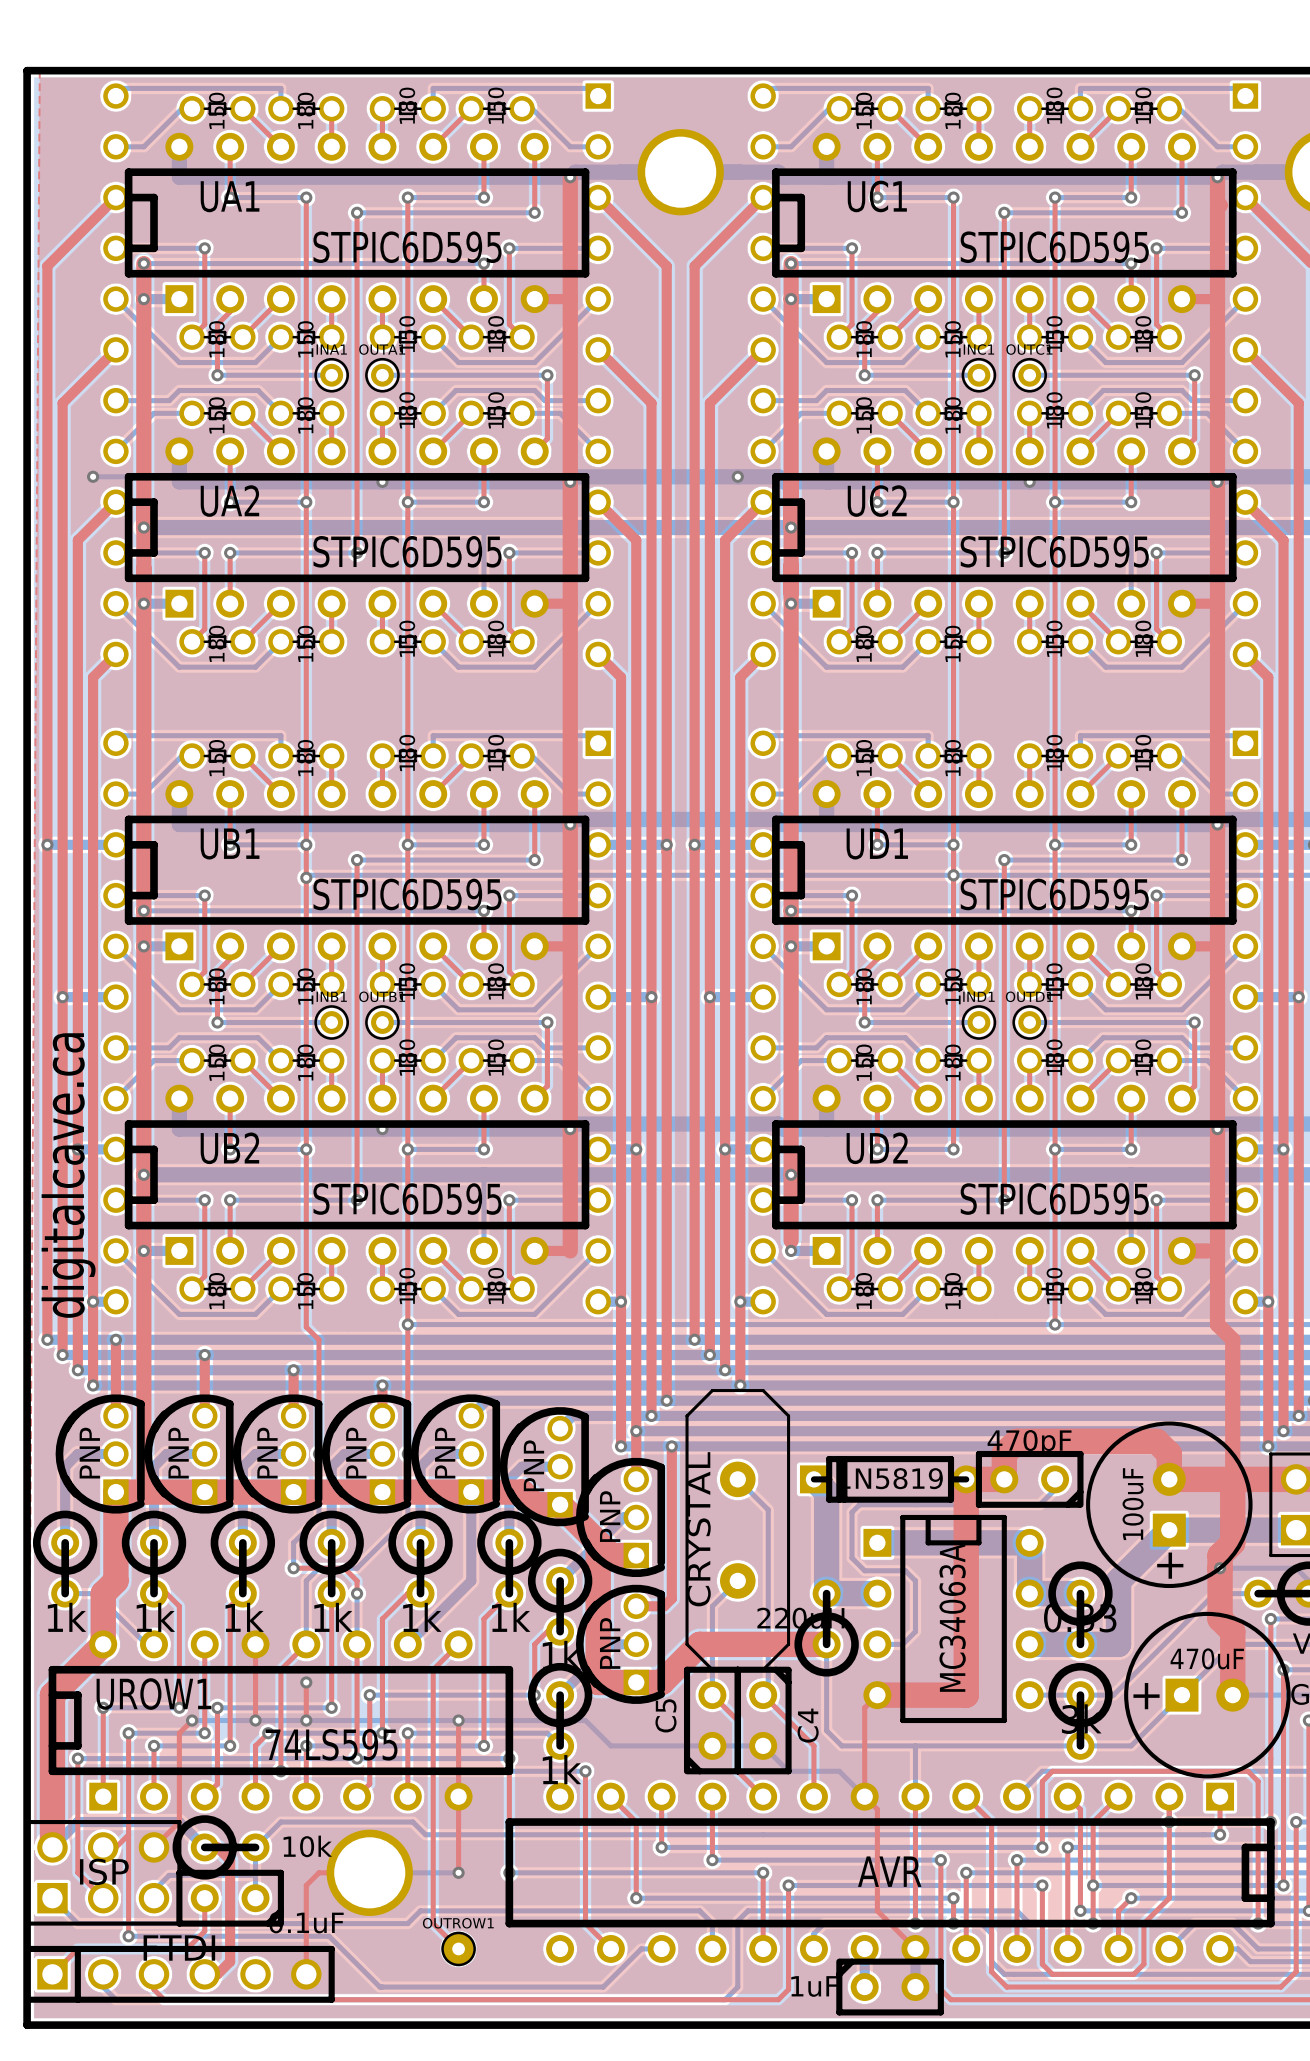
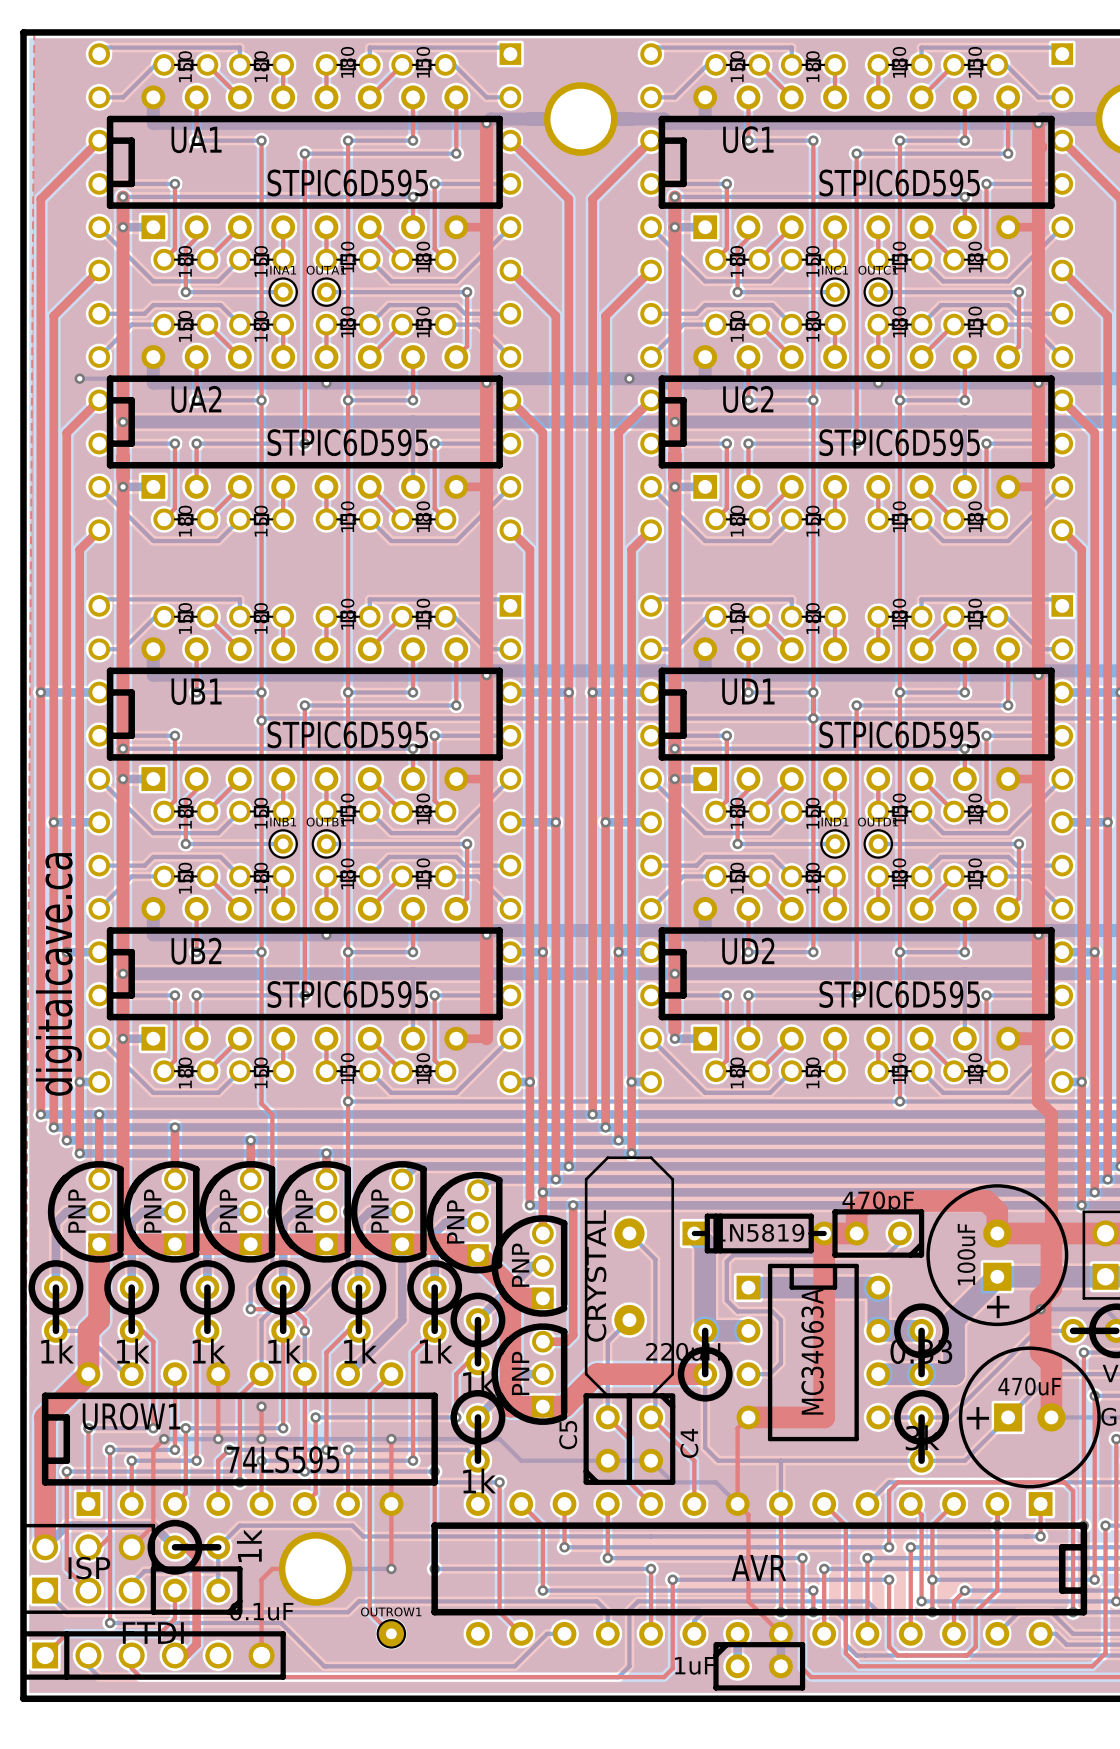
part value: 10k (307, 1846) -> 1k (249, 1545)

